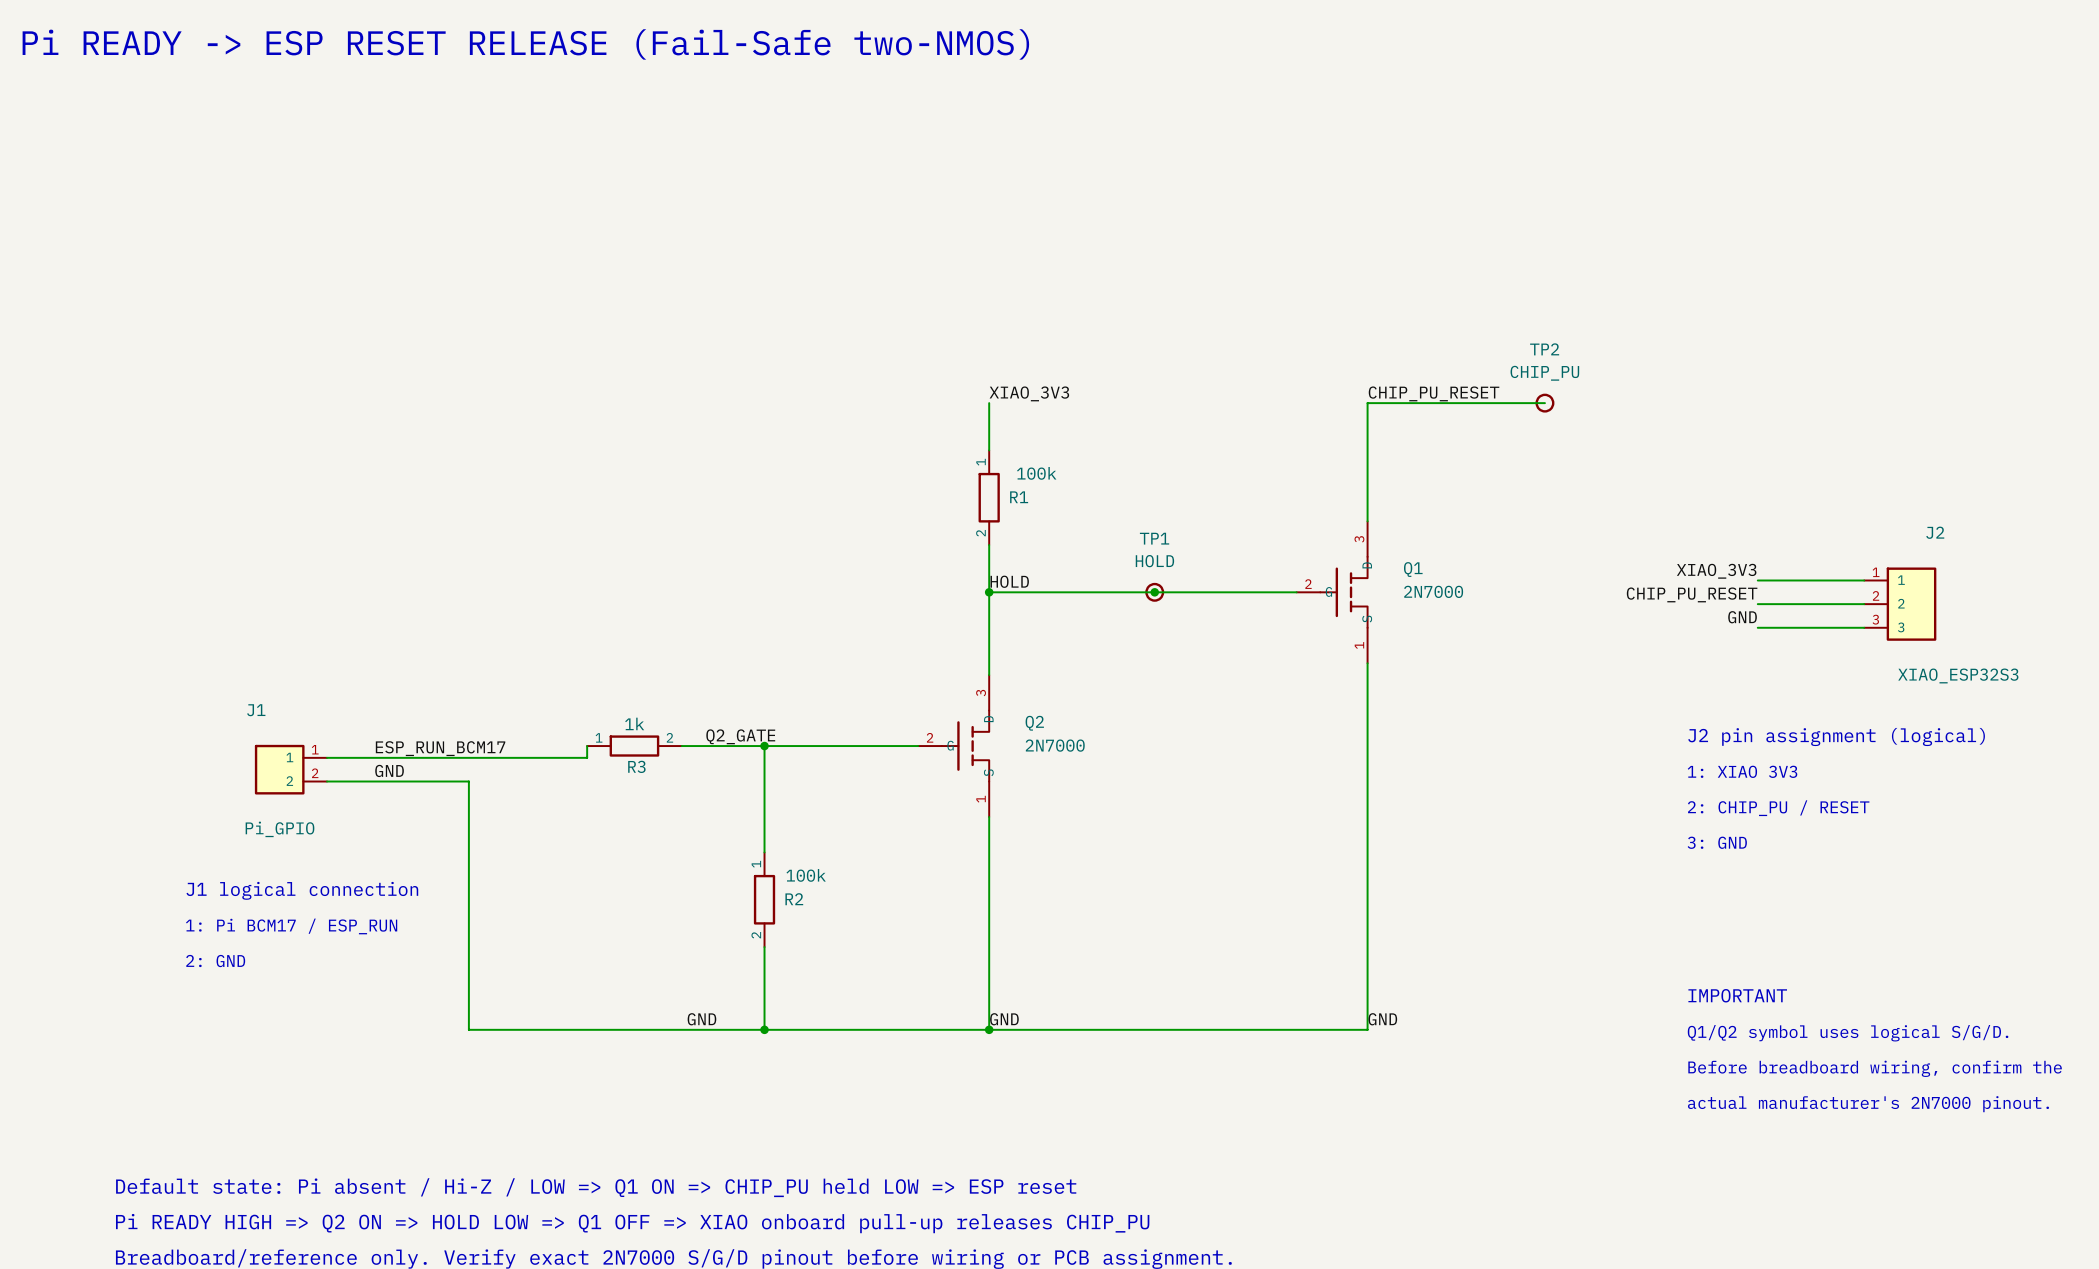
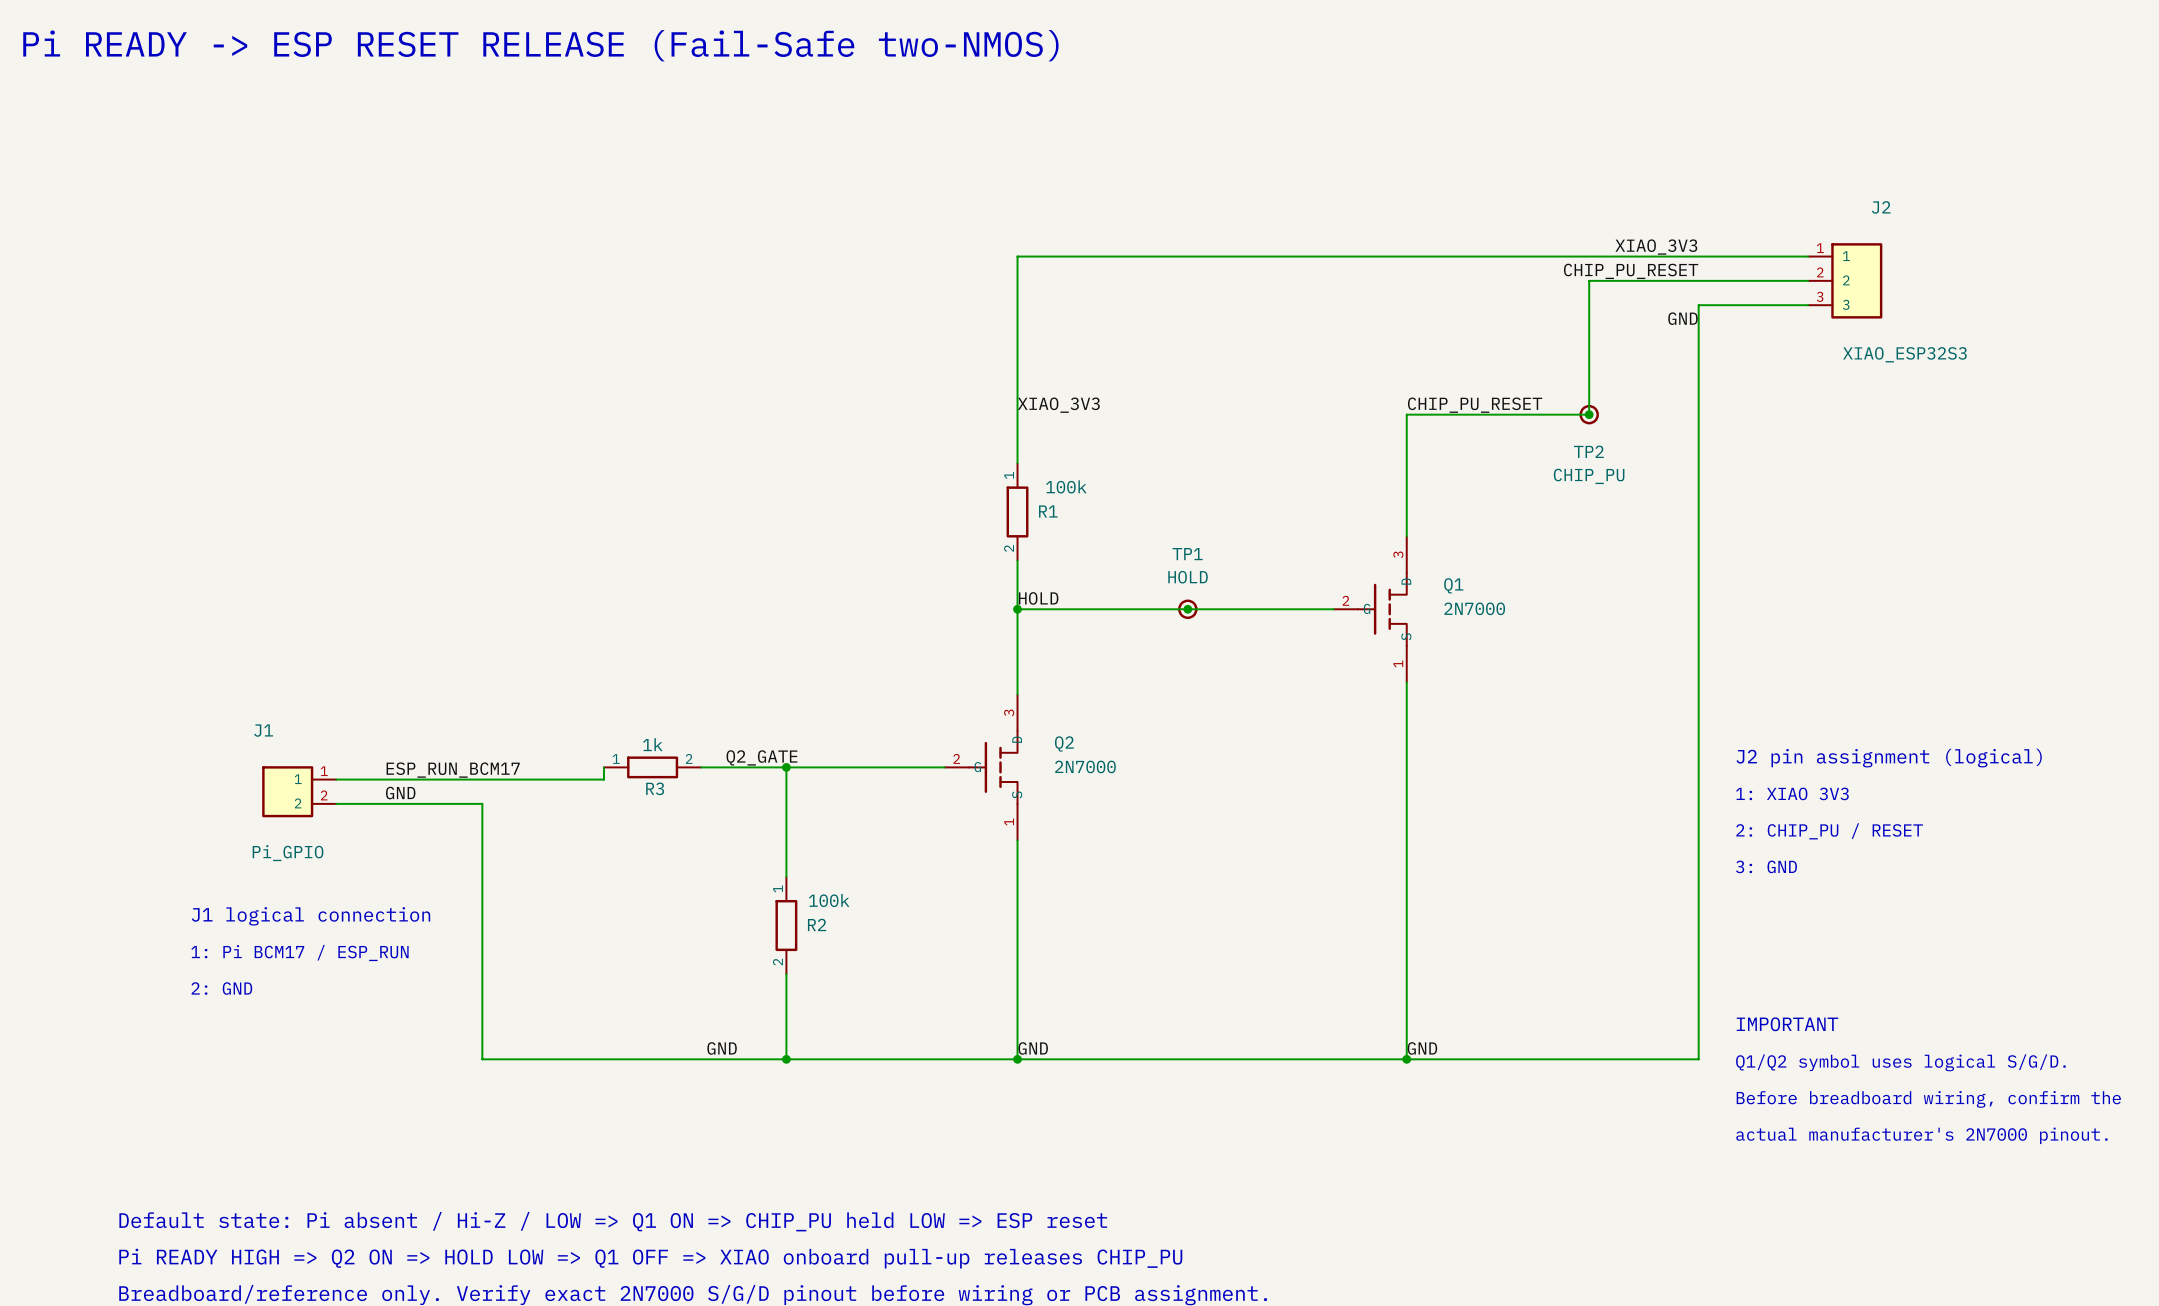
label: none -> XIAO_3V3 (1656, 247)
wire: none -> (1808, 256) (1017, 256) (1017, 414)
label: none -> CHIP_PU_RESET (1631, 271)
wire: none -> (1808, 280) (1589, 280) (1589, 414)
wire: none -> (1808, 305) (1698, 305) (1698, 1059) (1406, 1059)
label: none -> GND (1682, 318)
TP2 name position: TP2 (1544, 349) -> TP2 (1588, 451)
TP2 value position: CHIP_PU (1544, 373) -> CHIP_PU (1589, 476)
junction: none -> (1589, 414)
label: XIAO_3V3 (1716, 571) -> none
wire: (1757, 580) (1864, 580) -> none
label: CHIP_PU_RESET (1692, 594) -> none
wire: (1757, 604) (1864, 604) -> none
J2 position: (1900, 604) -> (1845, 280)
label: GND (1742, 617) -> none
wire: (1757, 627) (1864, 627) -> none
junction: none -> (1406, 1059)

